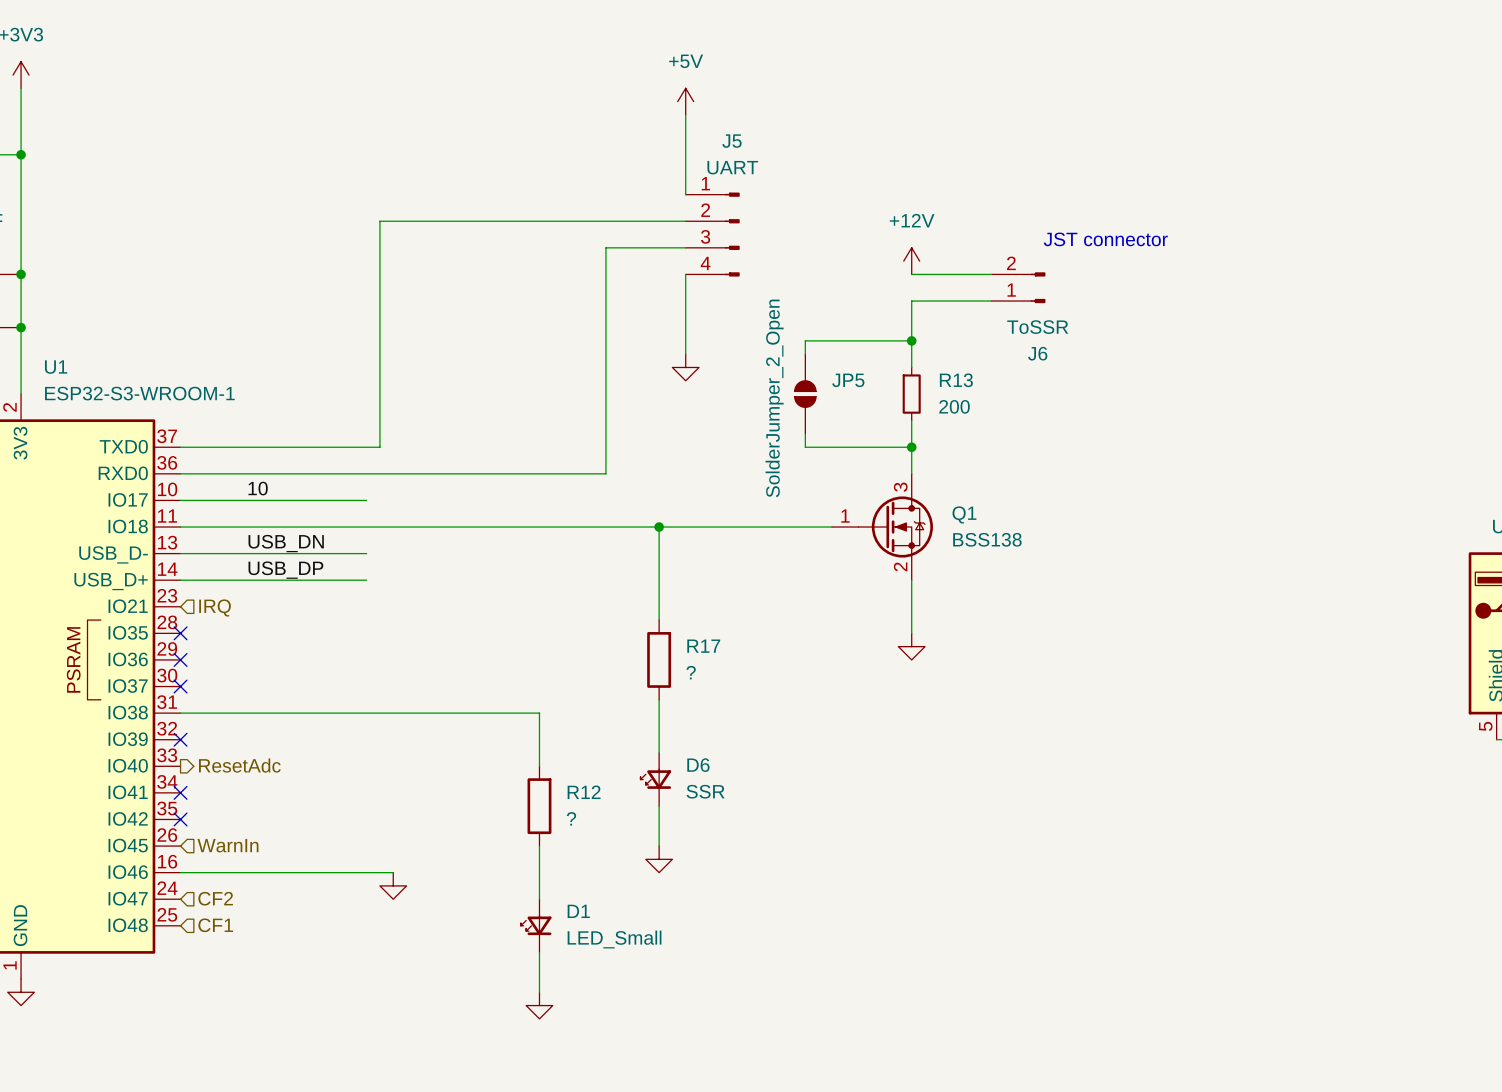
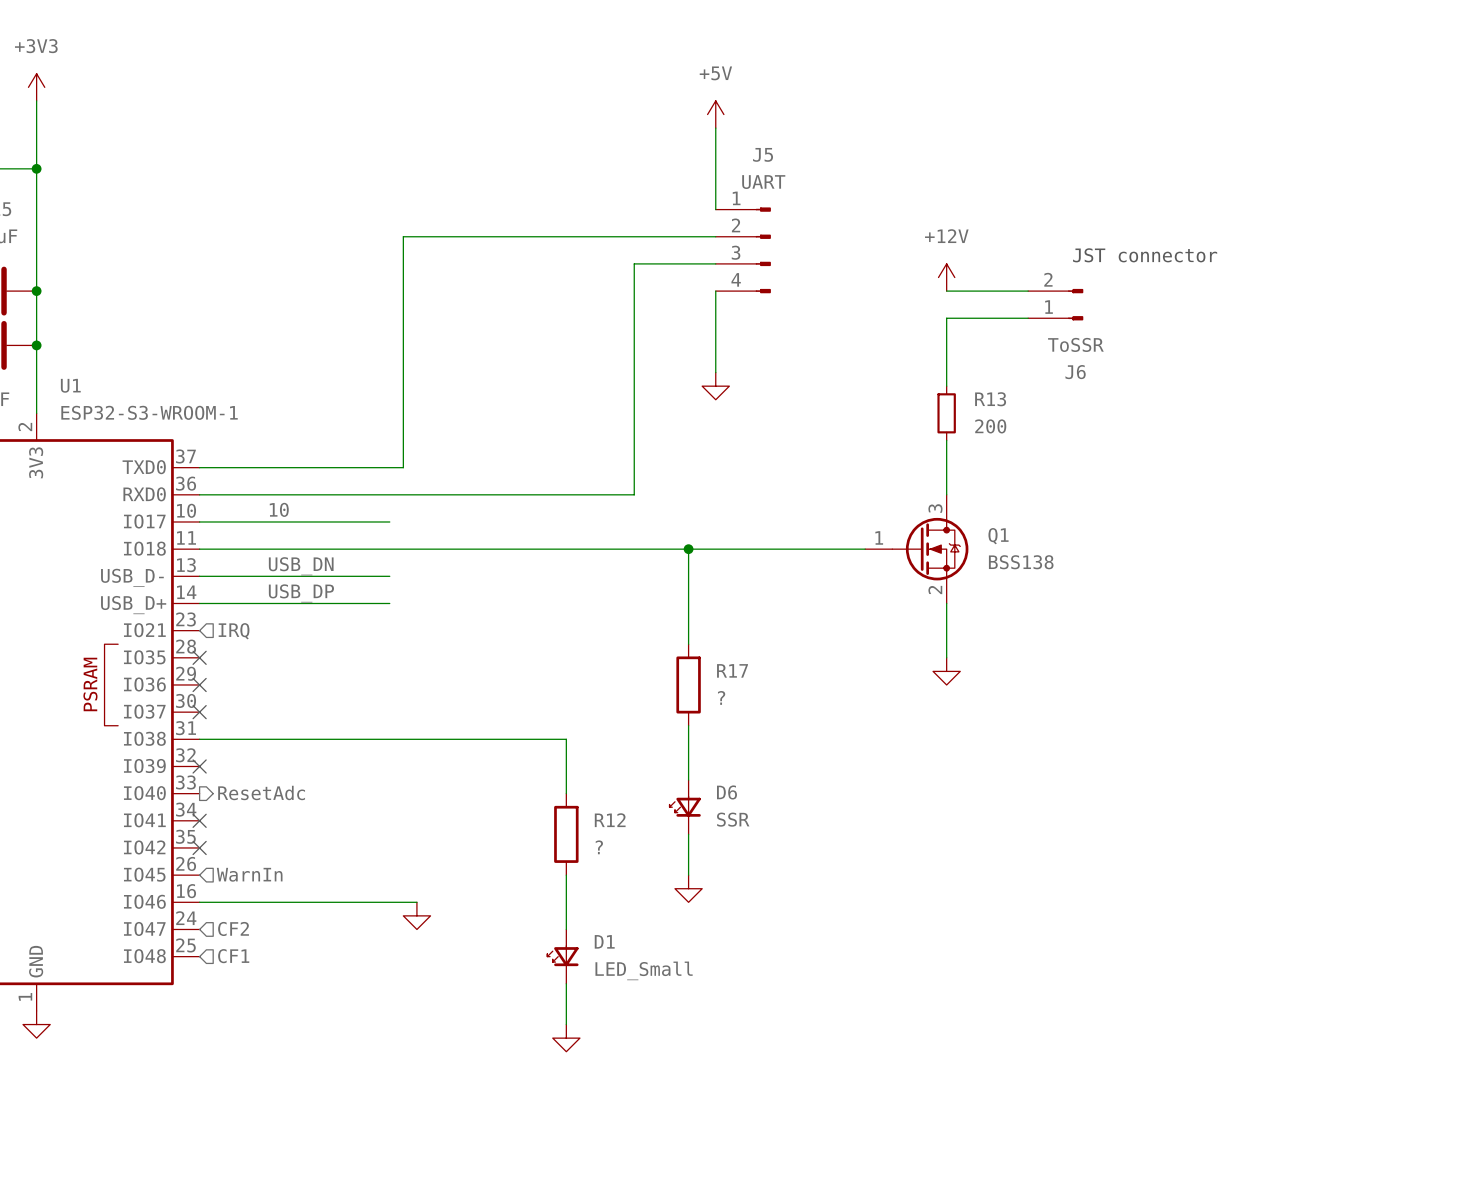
wire: (911, 340) (805, 340) (805, 354) -> none
junction: (911, 340) -> none
JP5: SolderJumper_2_Open (805, 394) -> none
wire: (805, 433) (805, 447) (911, 447) -> none
junction: (911, 447) -> none

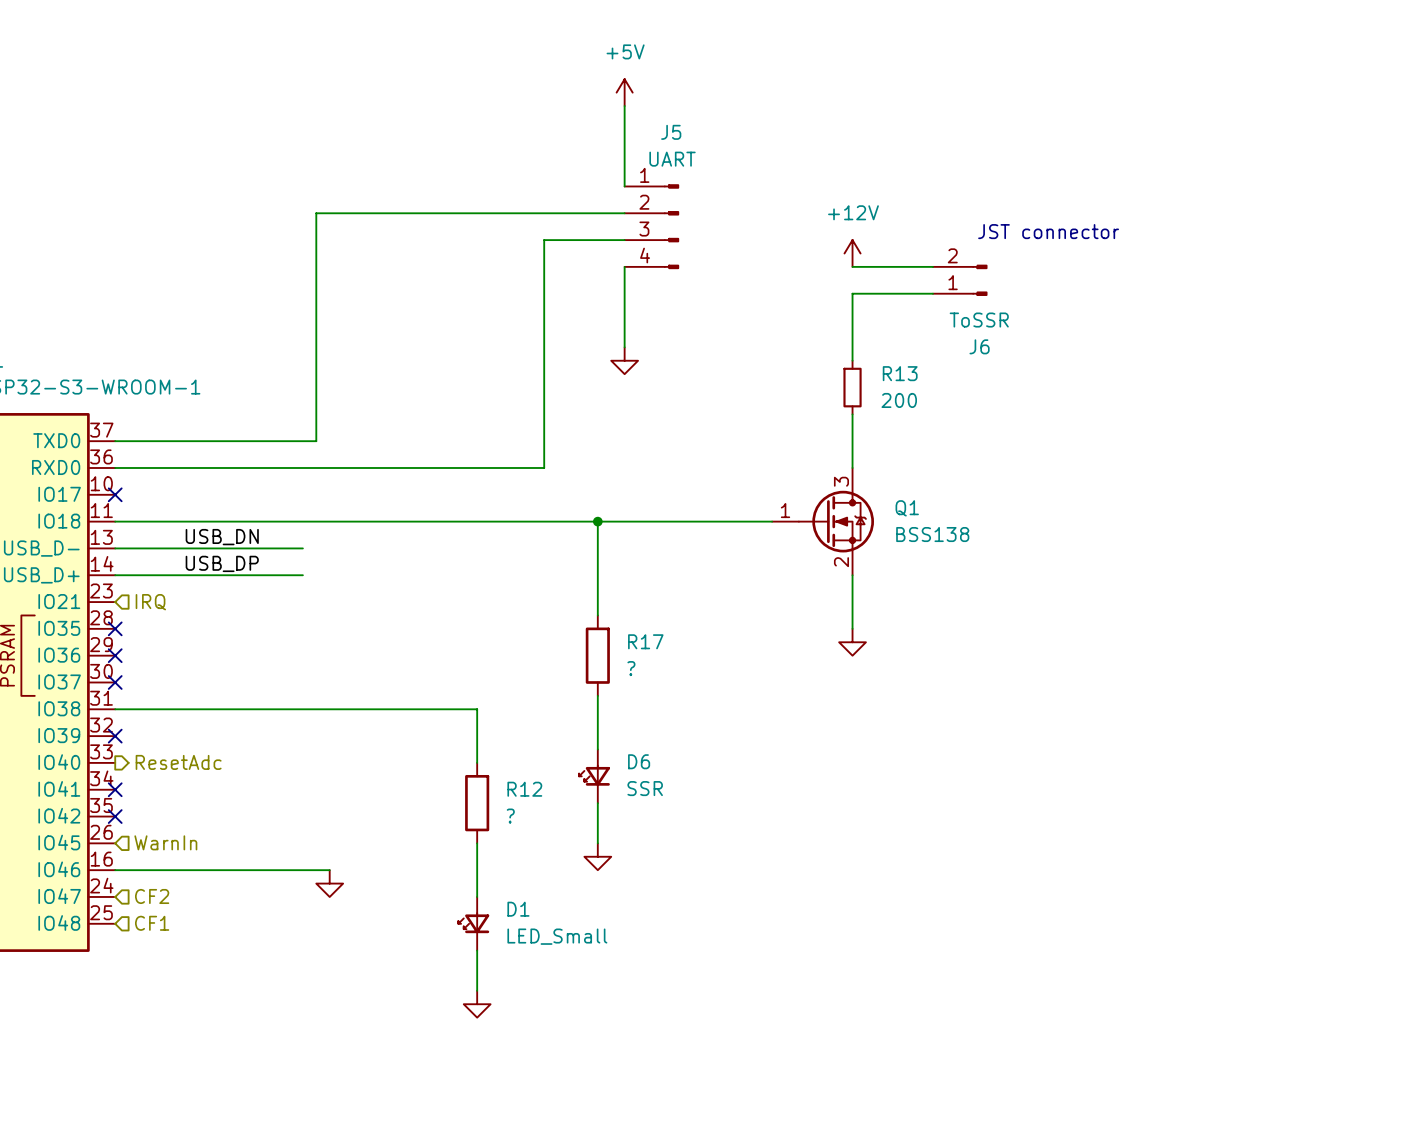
label: 10 (279, 509) -> none
wire: (199, 521) (389, 521) -> none
no-connect mark: none -> (115, 494)

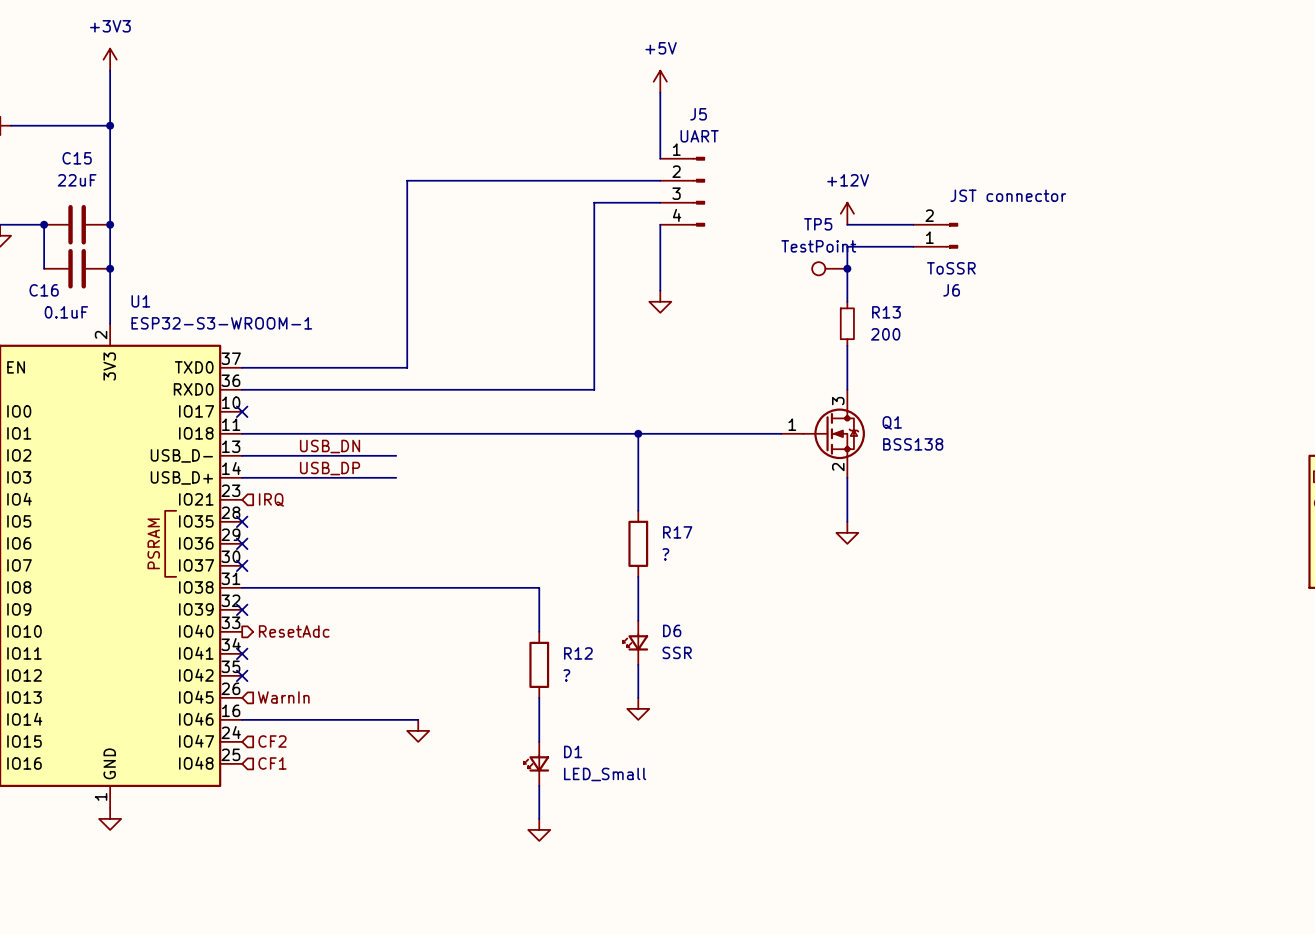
TP5: none -> TestPoint (829, 268)
junction: none -> (847, 268)

